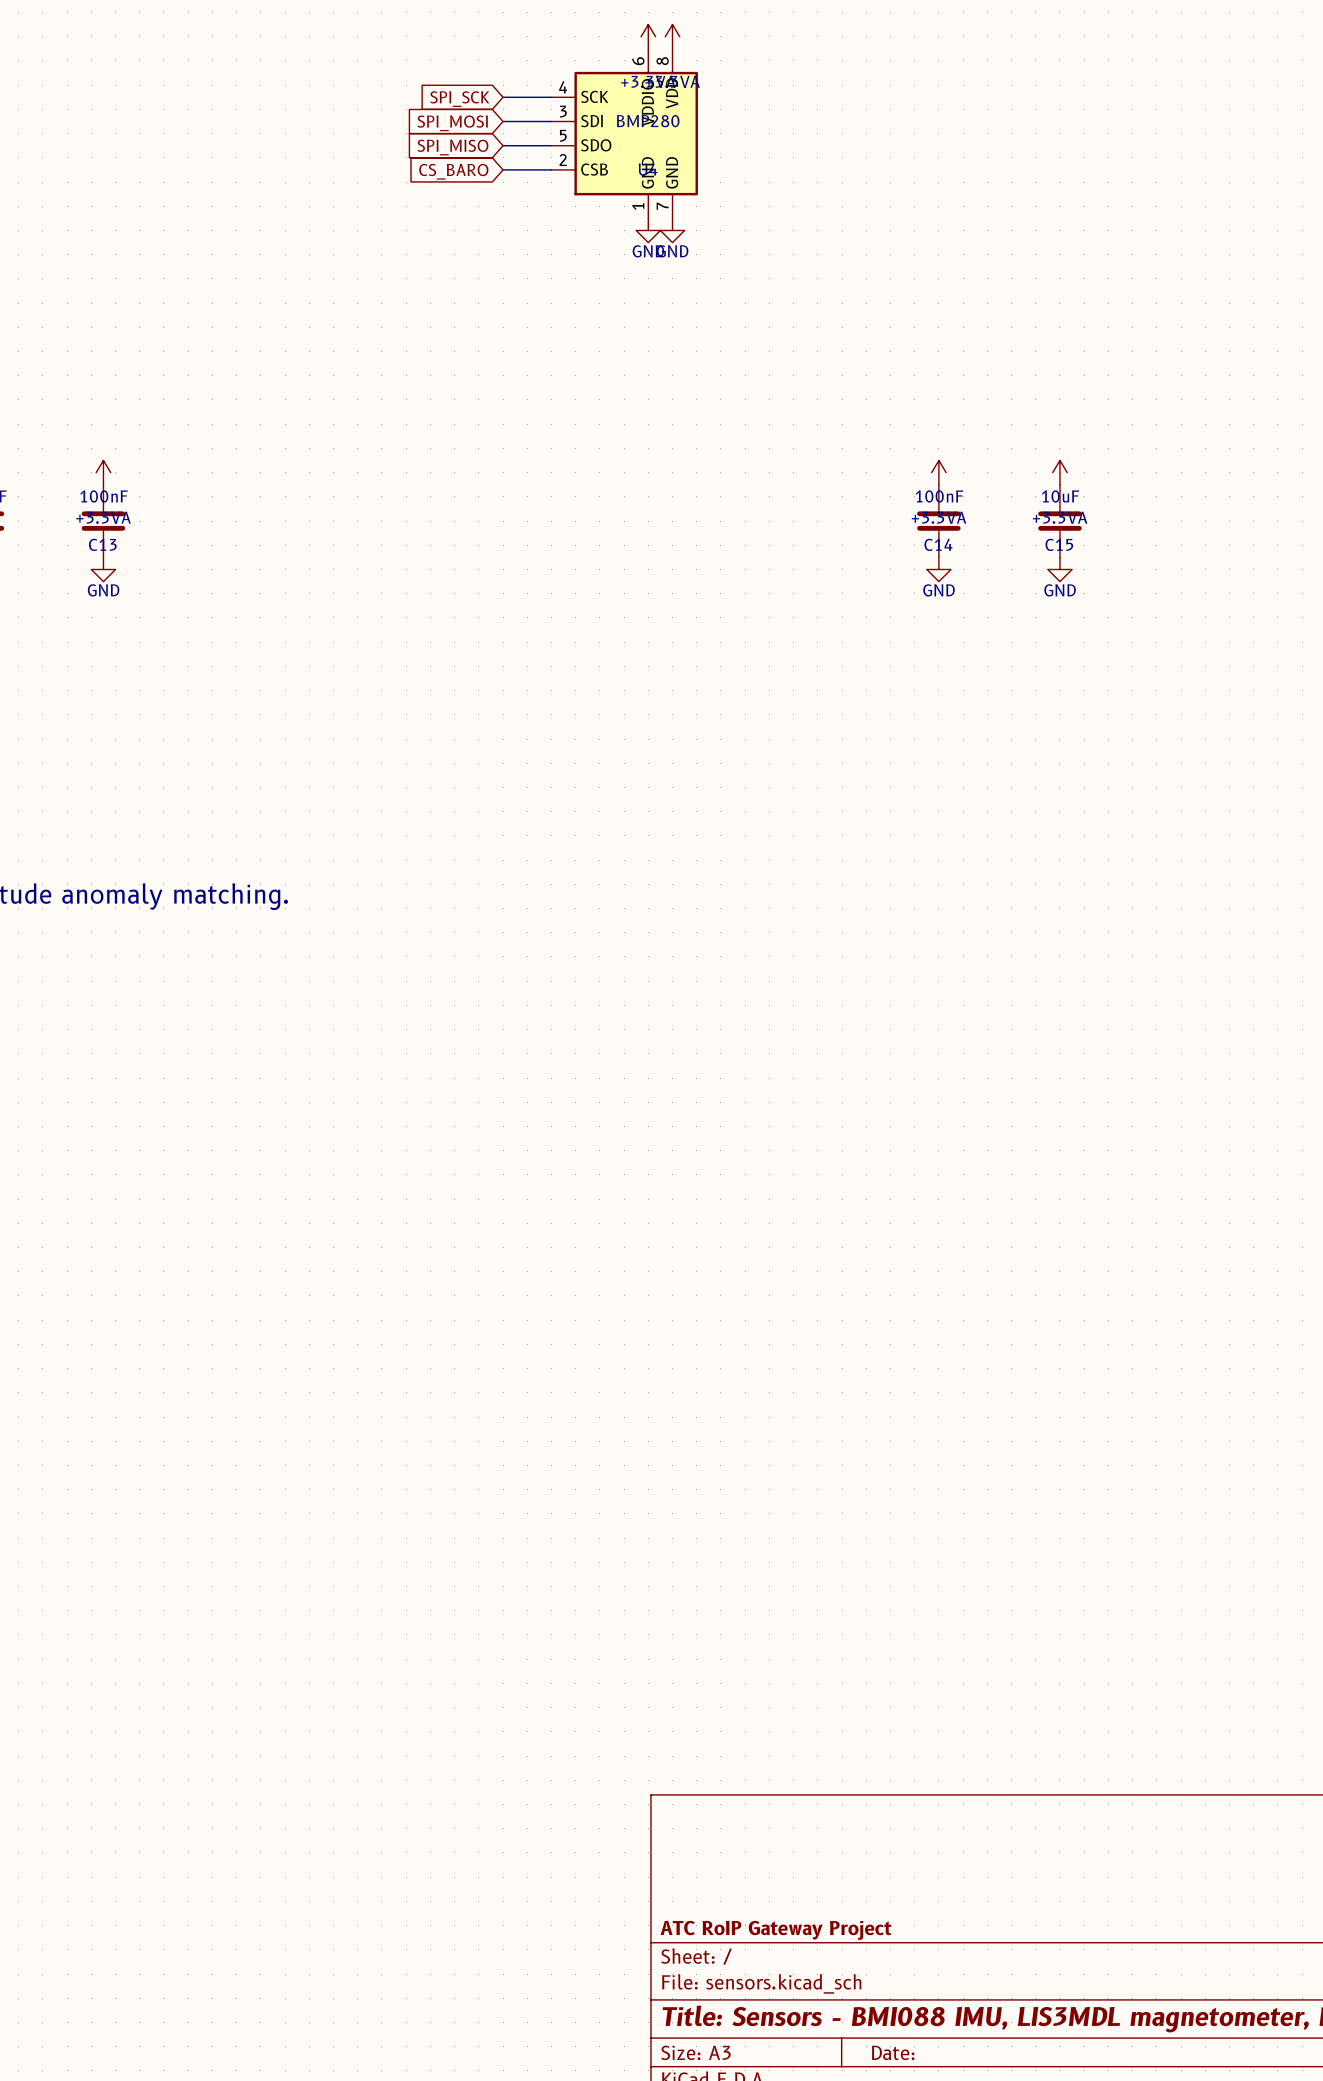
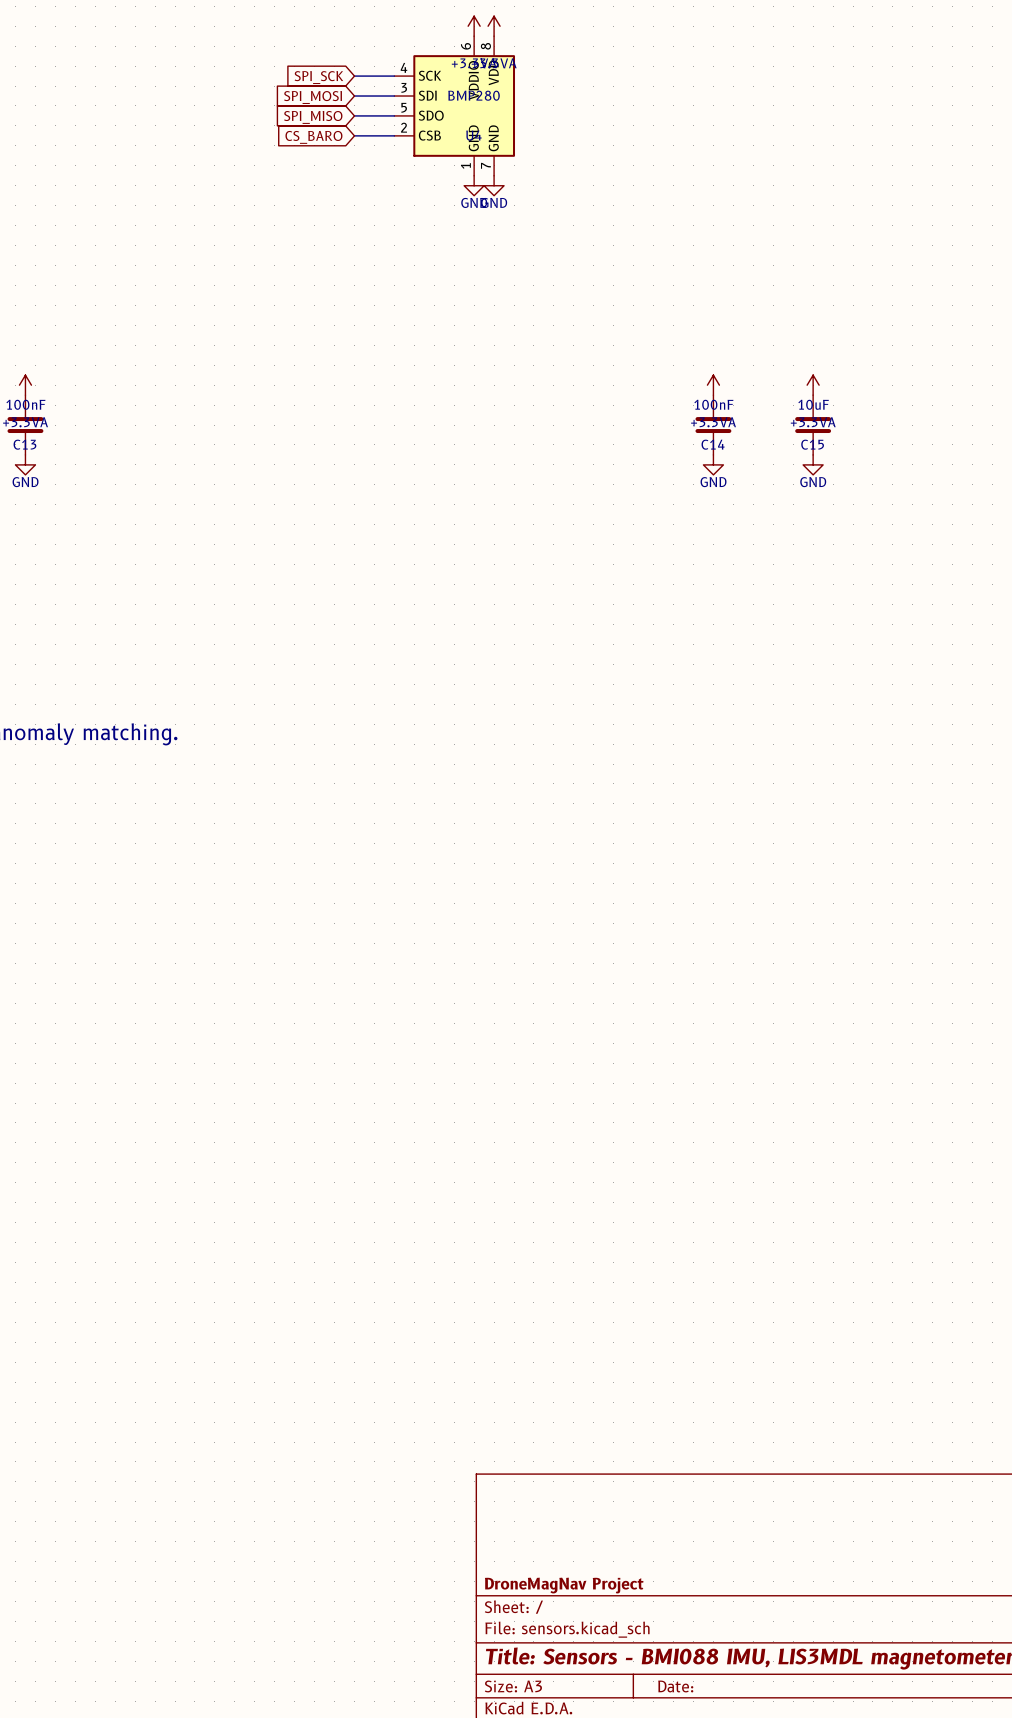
title block: ATC RoIP Gateway Project (775, 1930) -> DroneMagNav Project (564, 1585)

